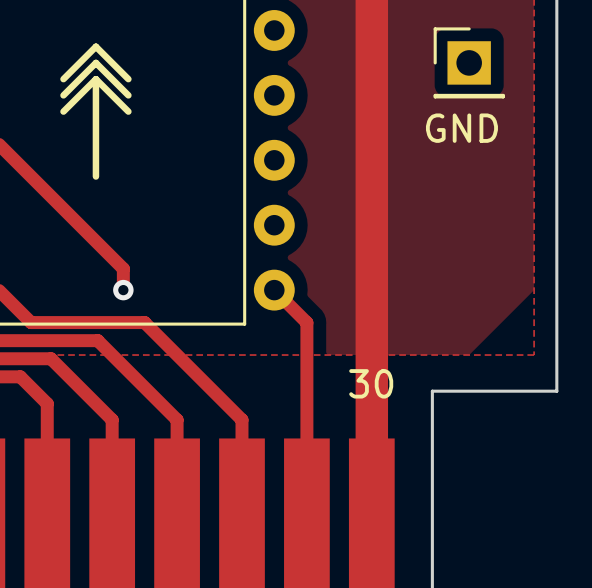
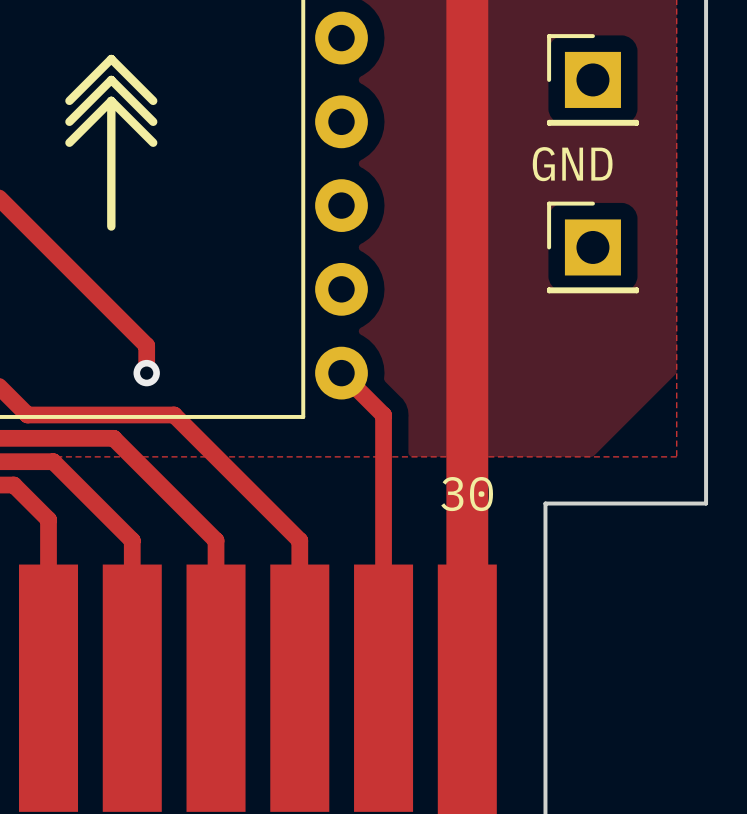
part: none -> (592, 247)

